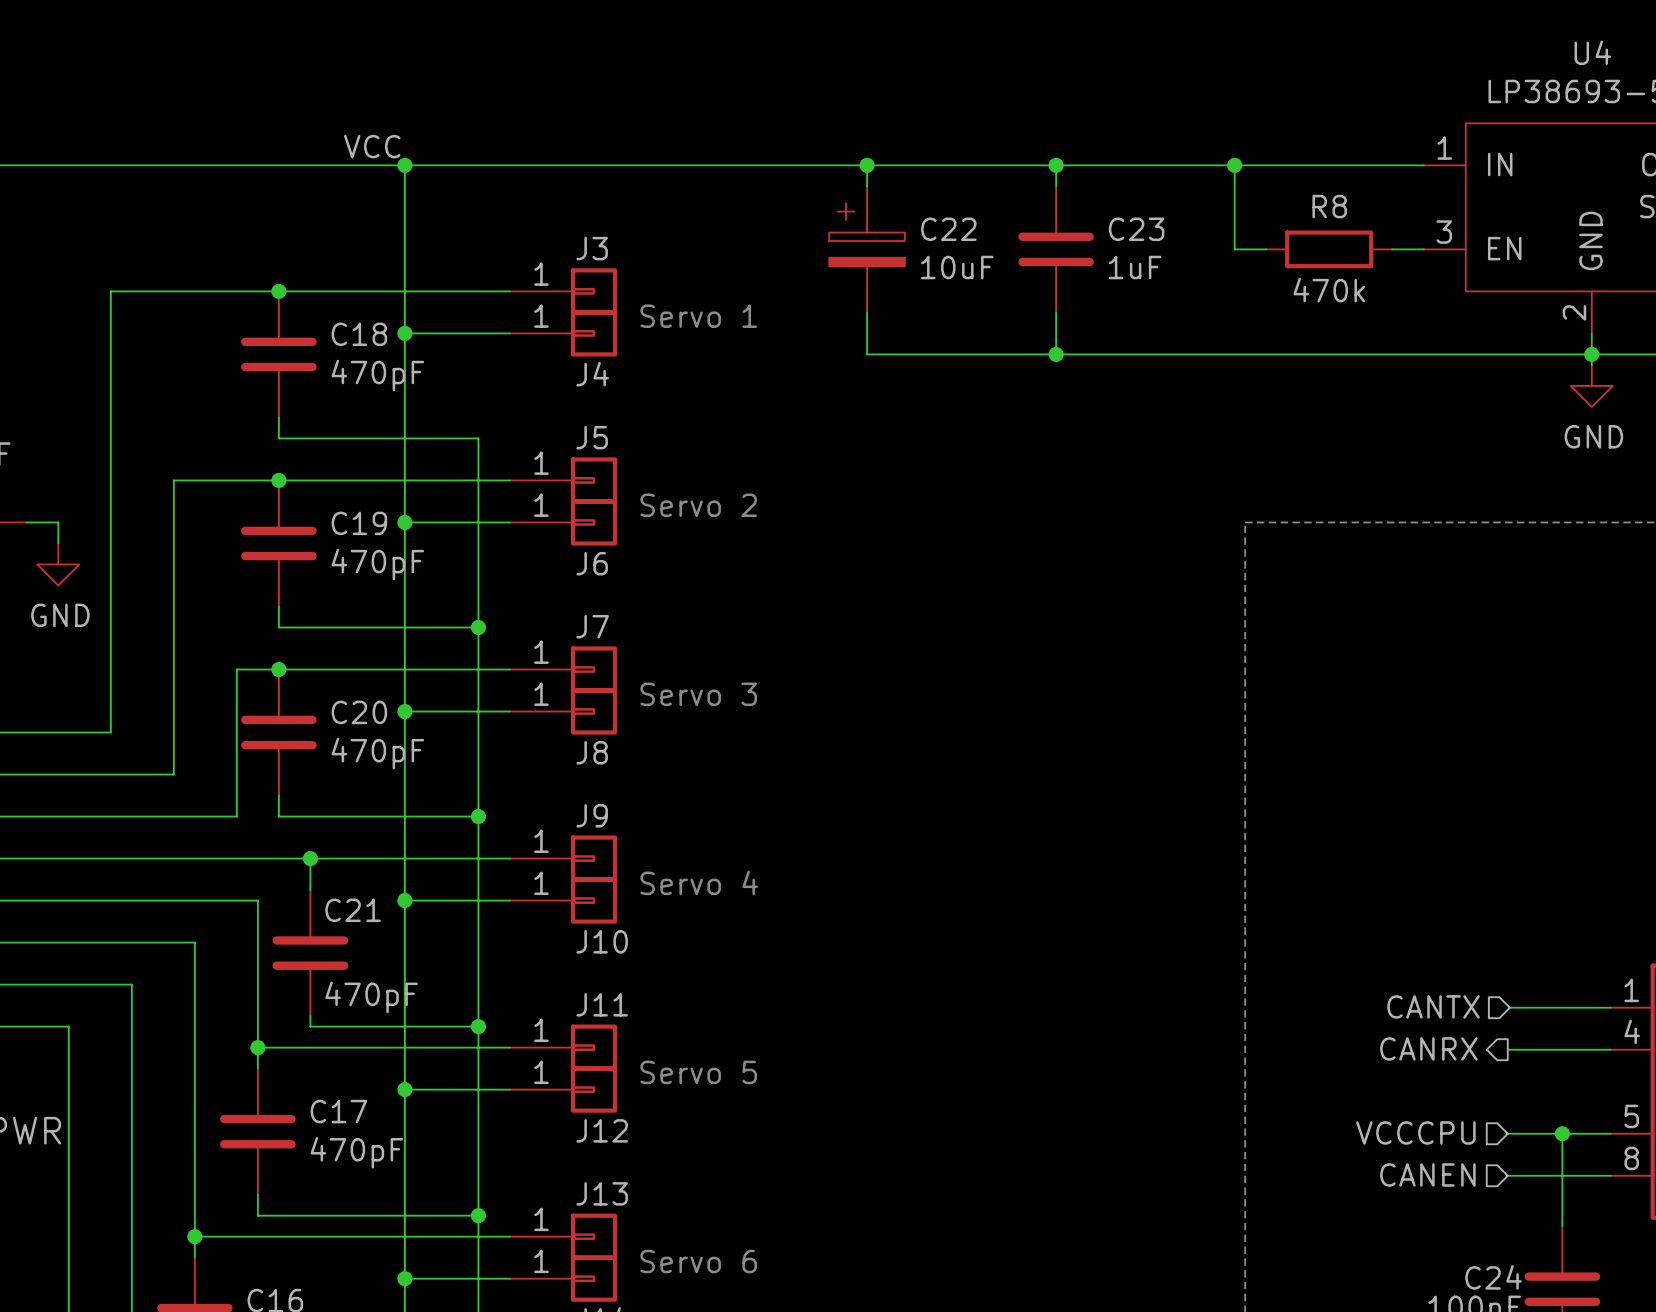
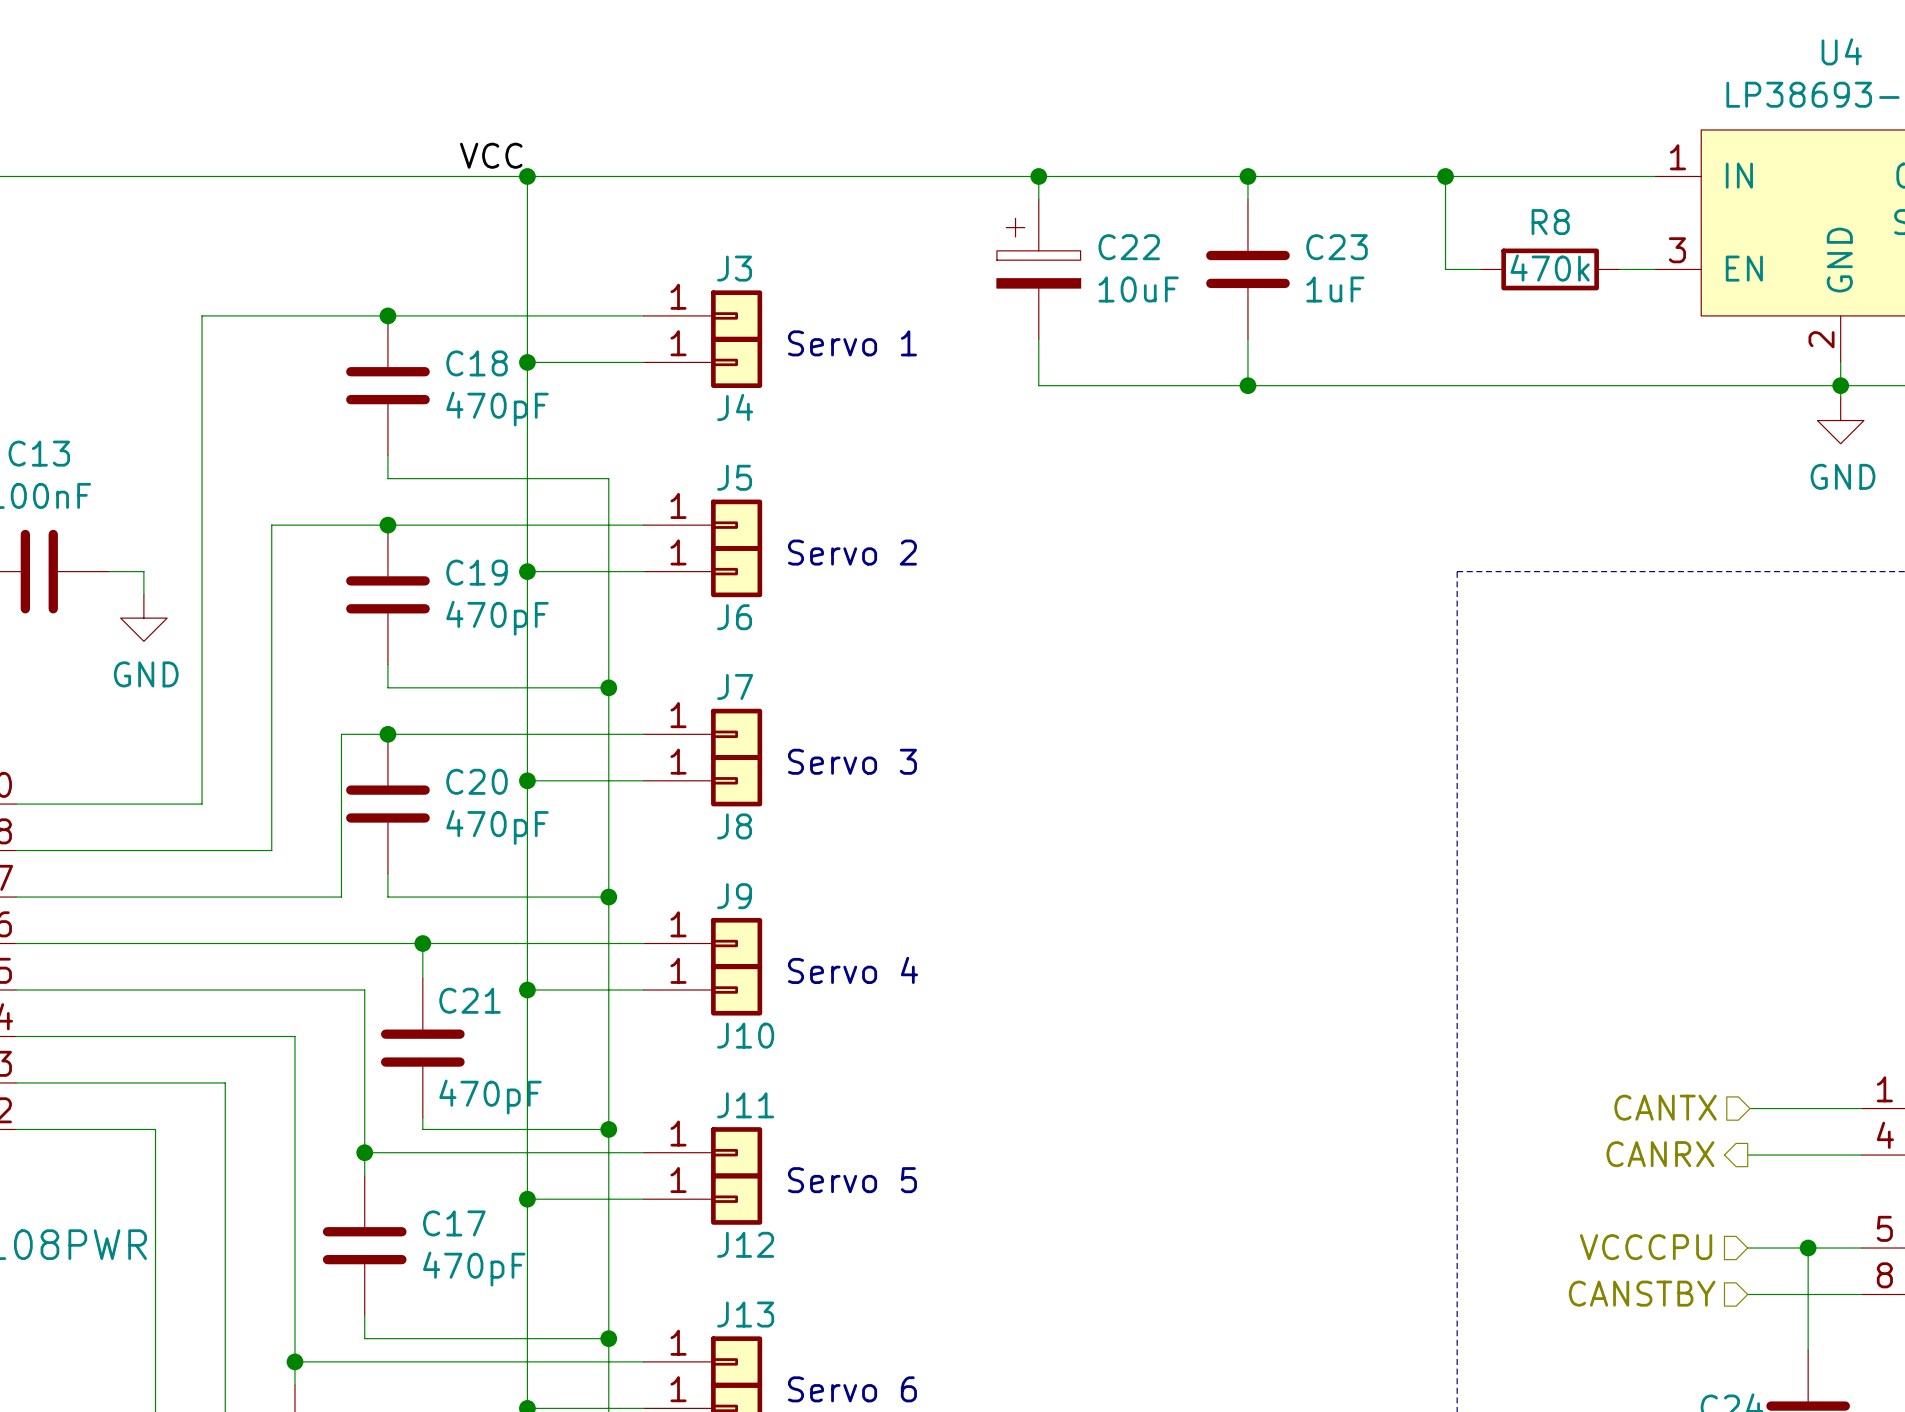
R8 value position: 470k (1329, 290) -> 470k (1550, 268)
hierarchical label: CANEN (1427, 1174) -> CANSTBY (1642, 1293)

